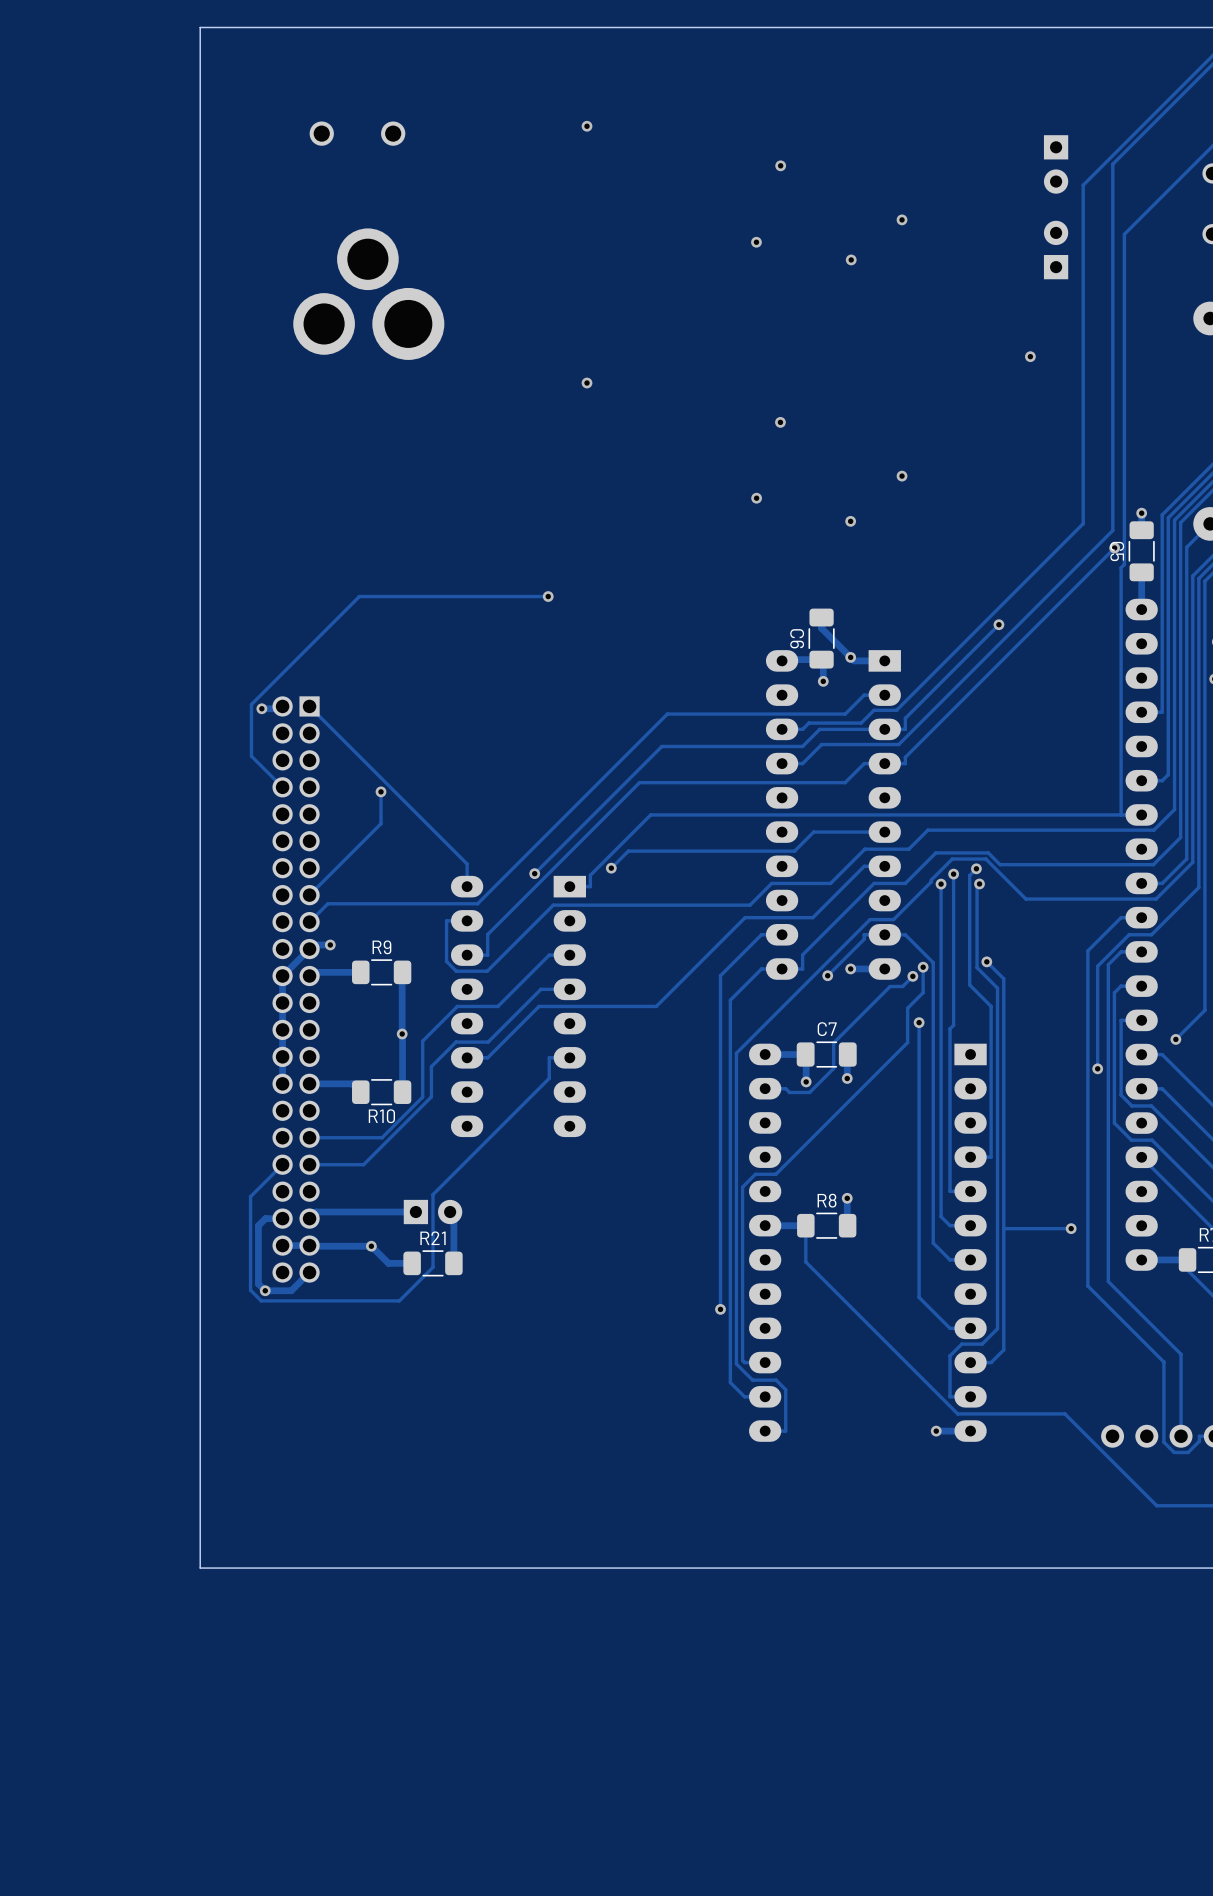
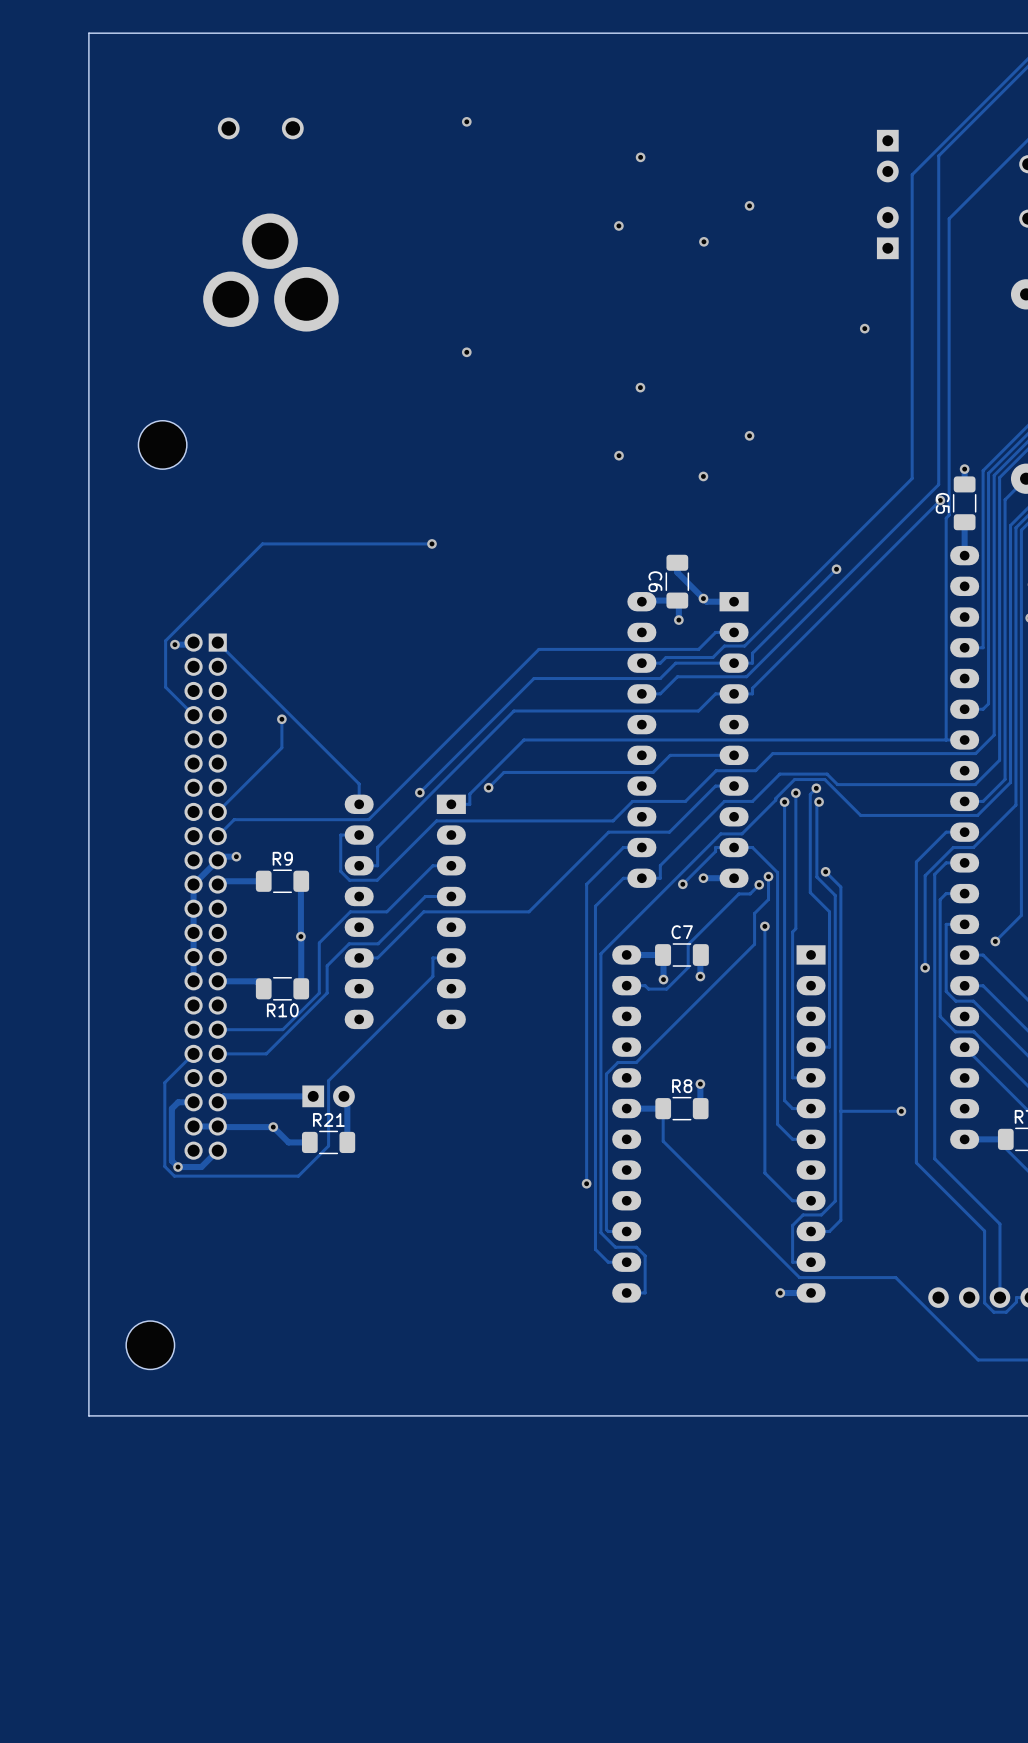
board edge: (200, 27) (200, 1568) -> (119, 33) (88, 33) (88, 1415) (119, 1415)
part: none -> (162, 444)
part: none -> (150, 1345)

